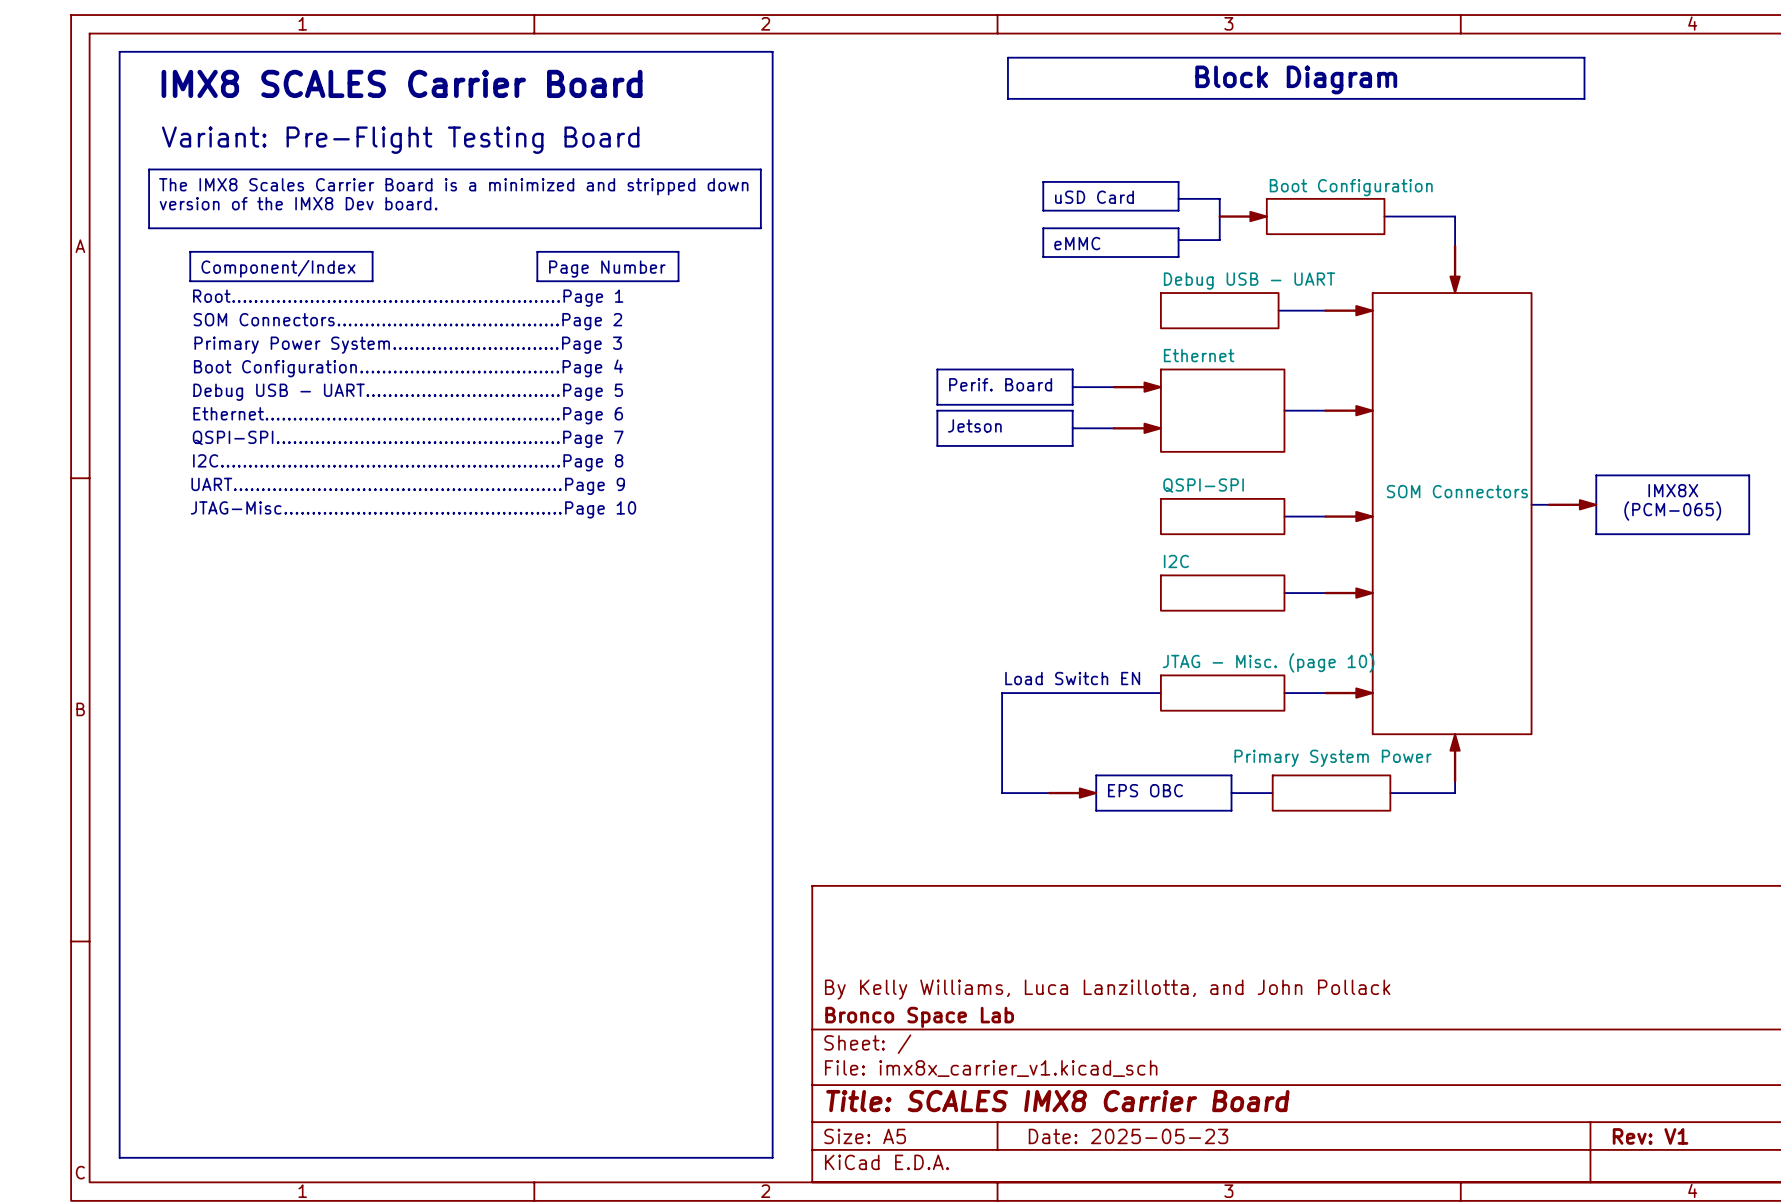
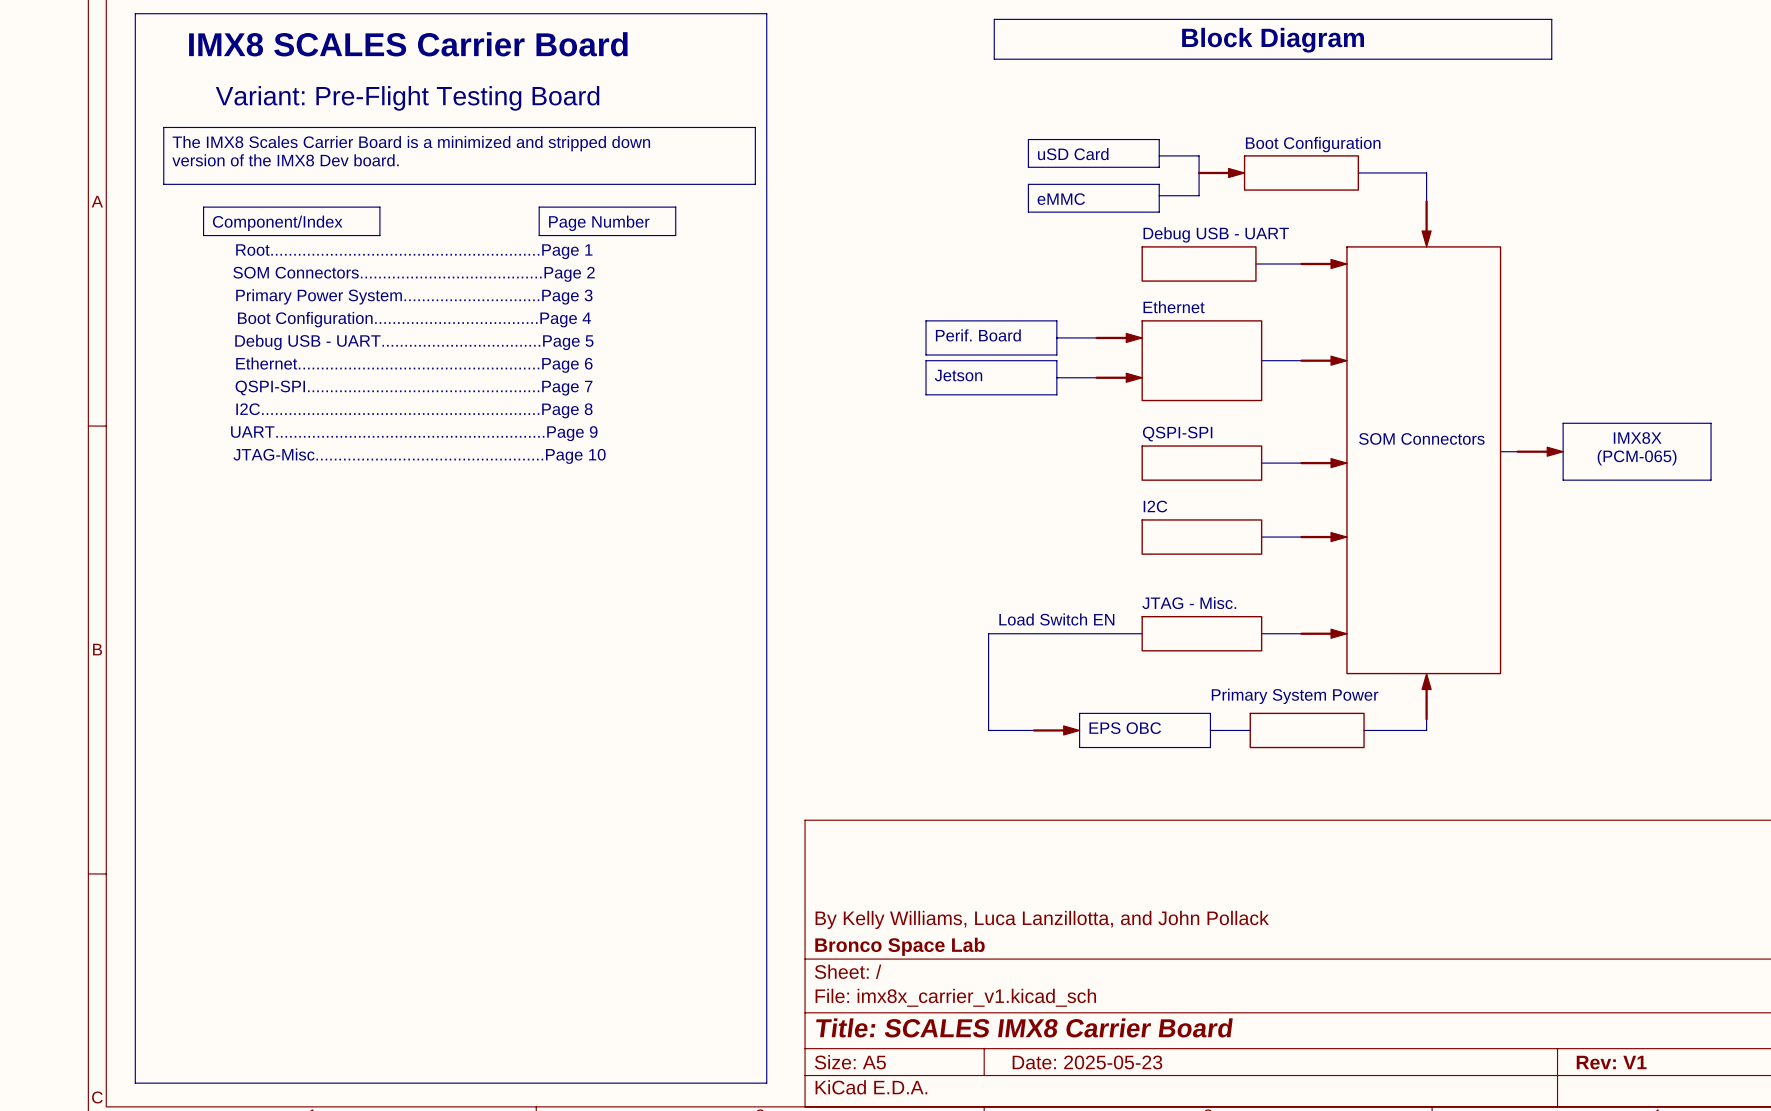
sheet JTAG - Misc. (page 10) name: JTAG - Misc. (page 10) (1268, 662) -> JTAG - Misc. (1189, 603)

